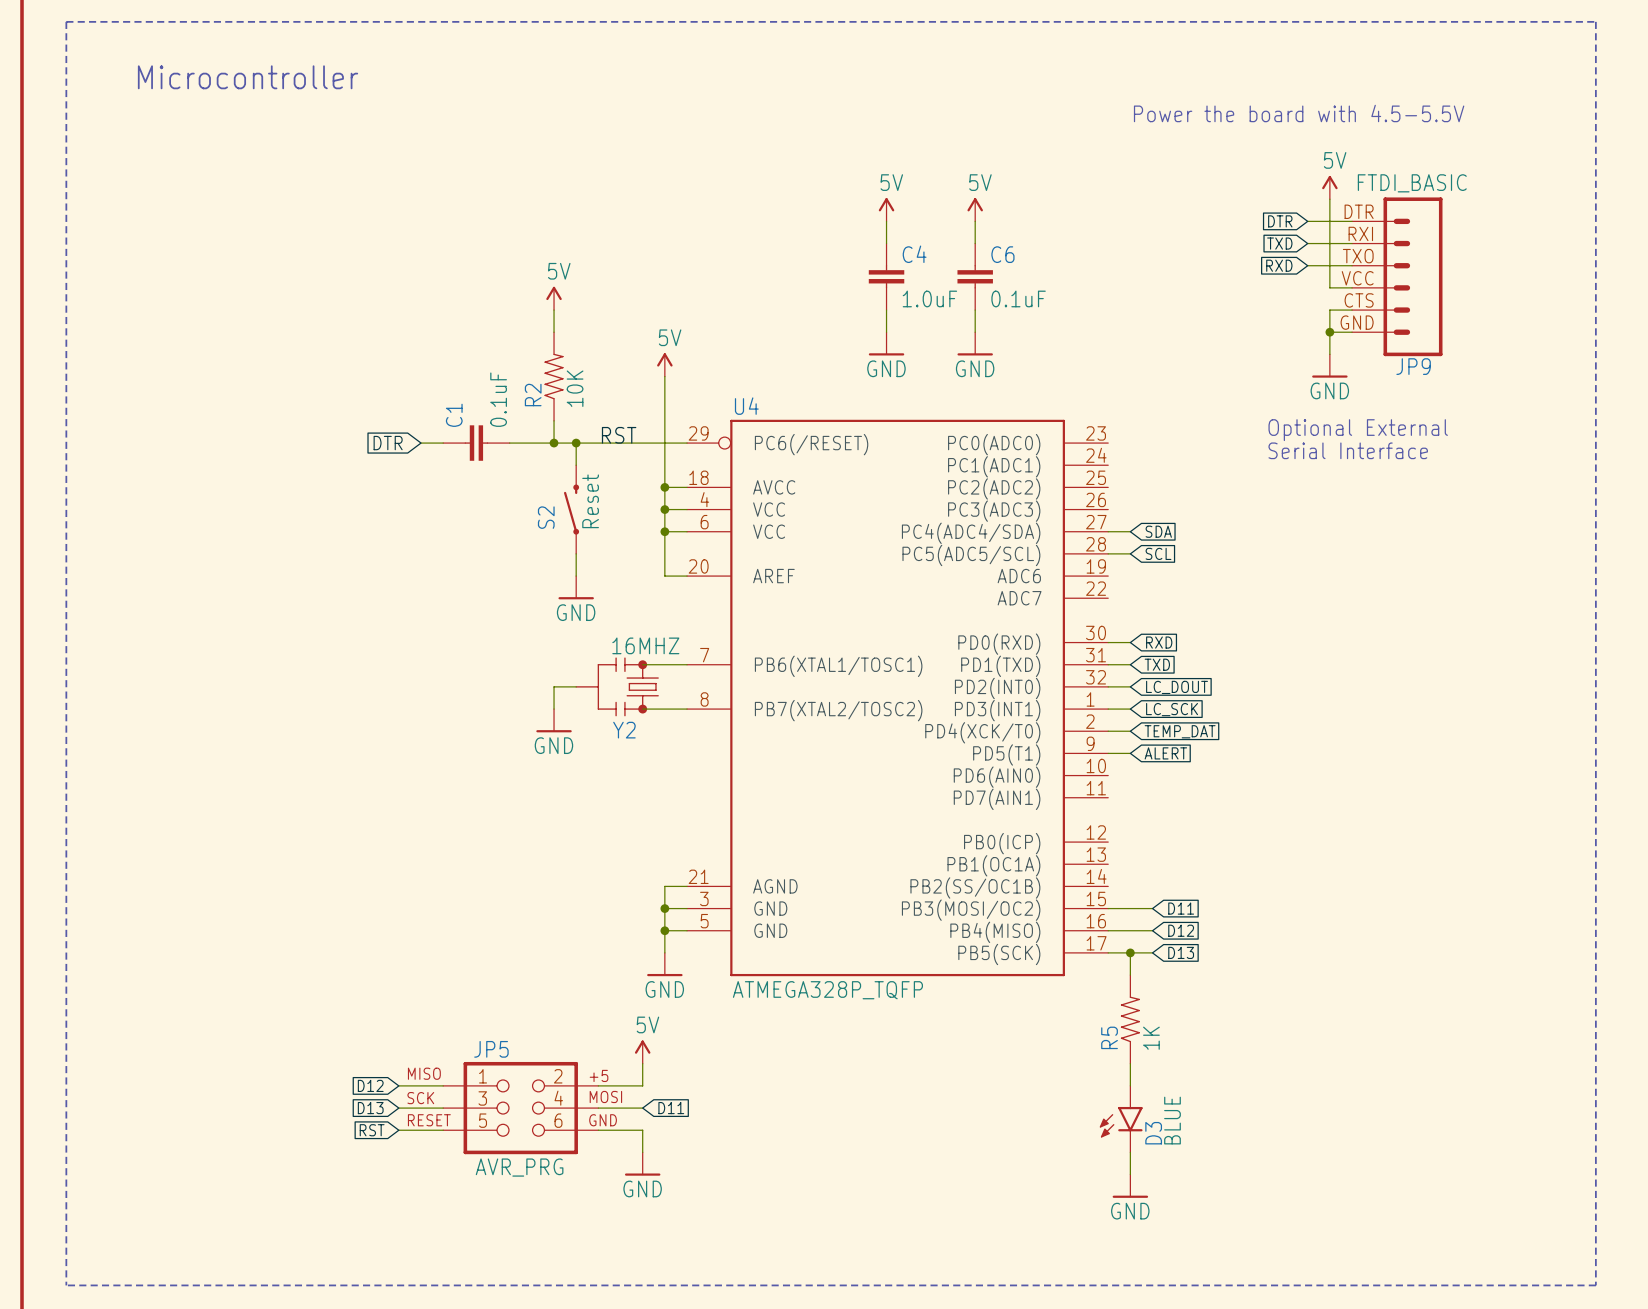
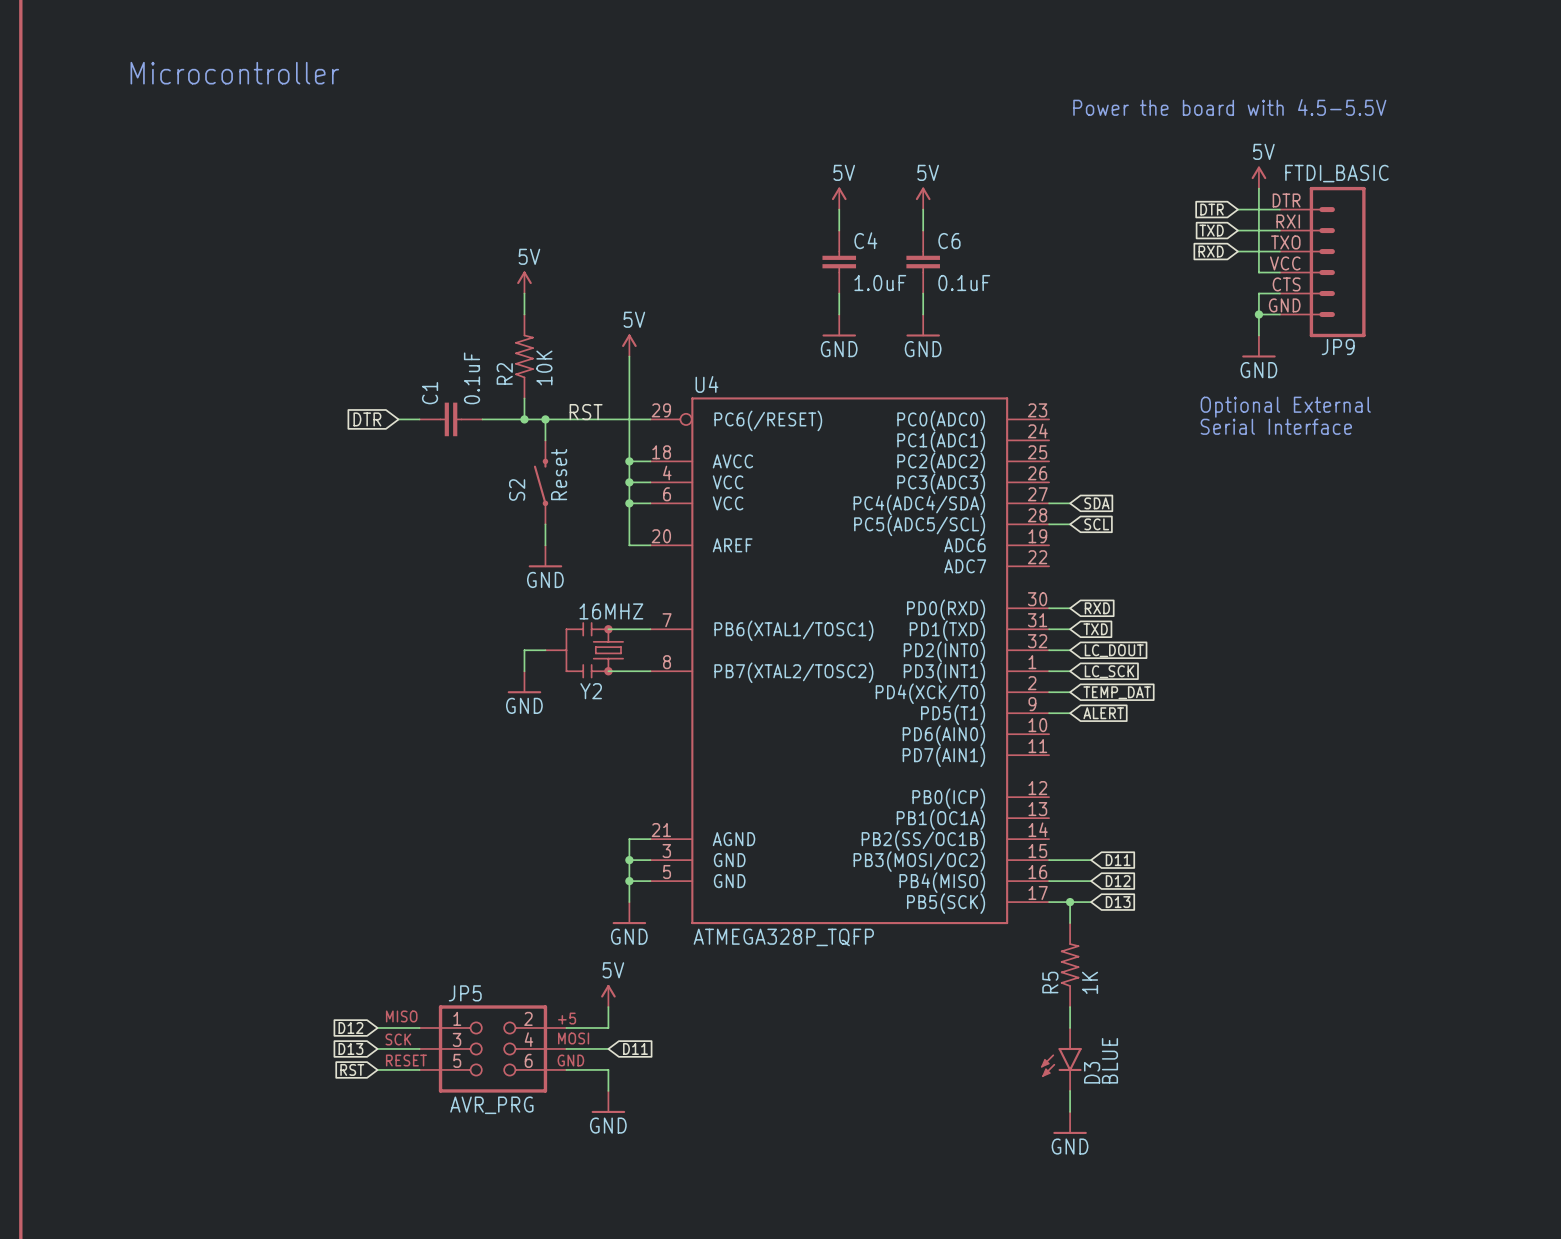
line: (66, 21) (1595, 21) (1595, 1285) (66, 1285) (66, 21) -> none

